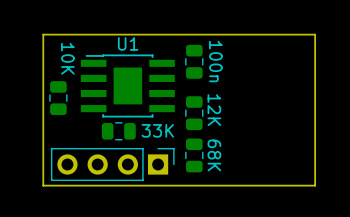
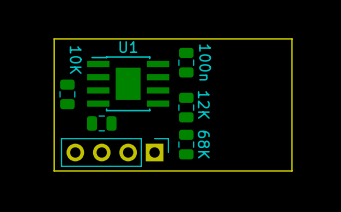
part: none -> (101, 123)
part: 33K (118, 131) -> none

